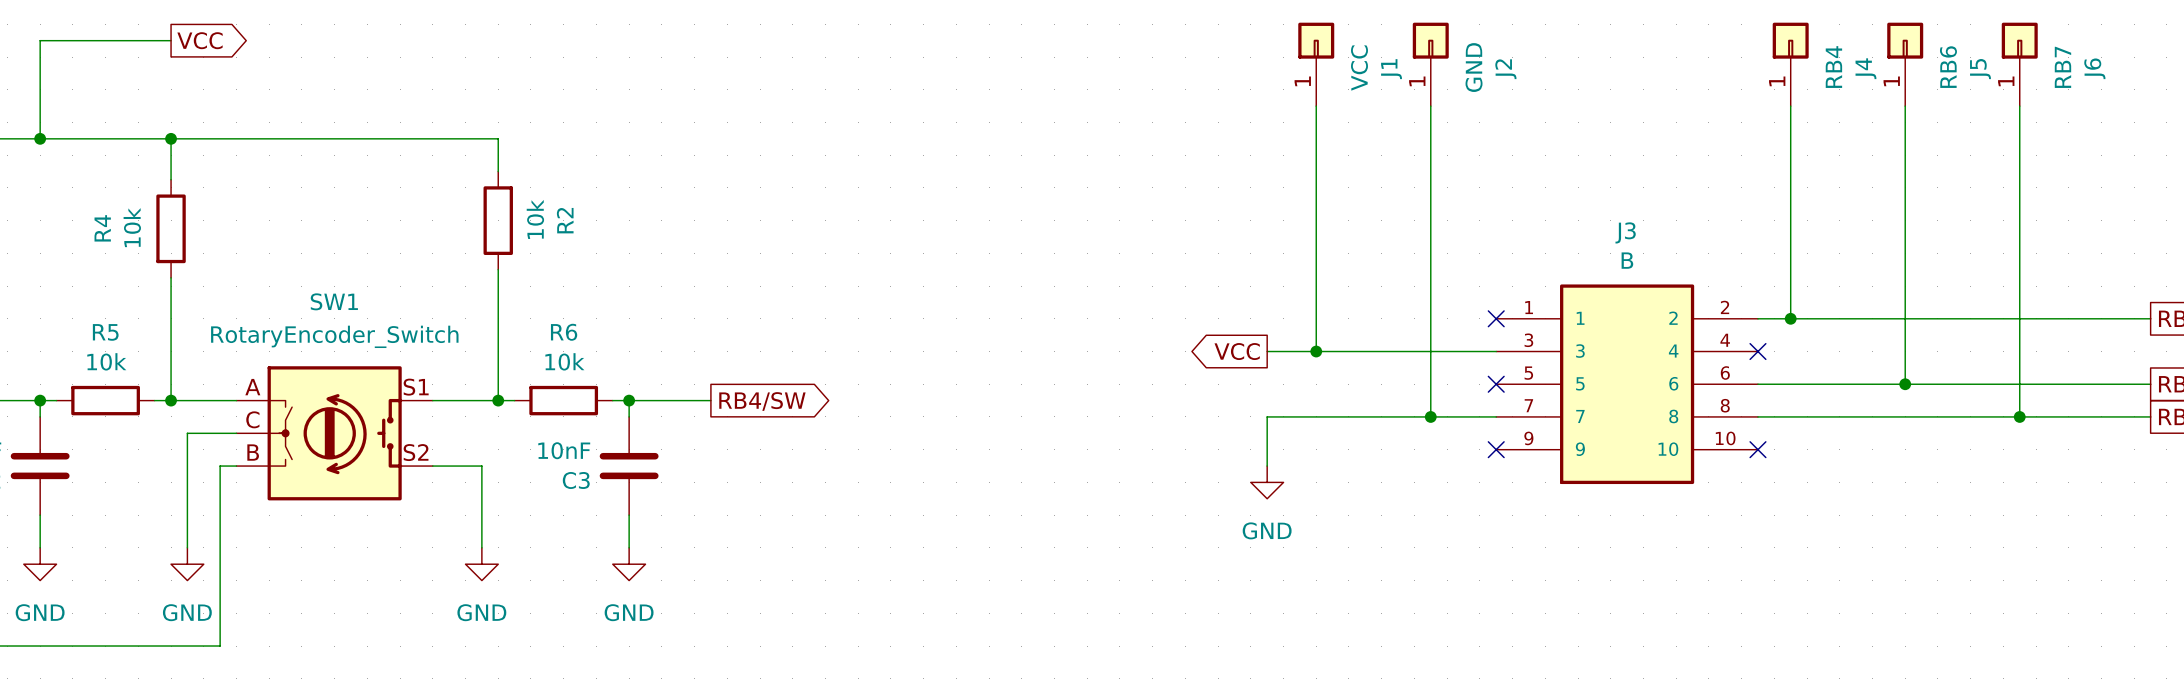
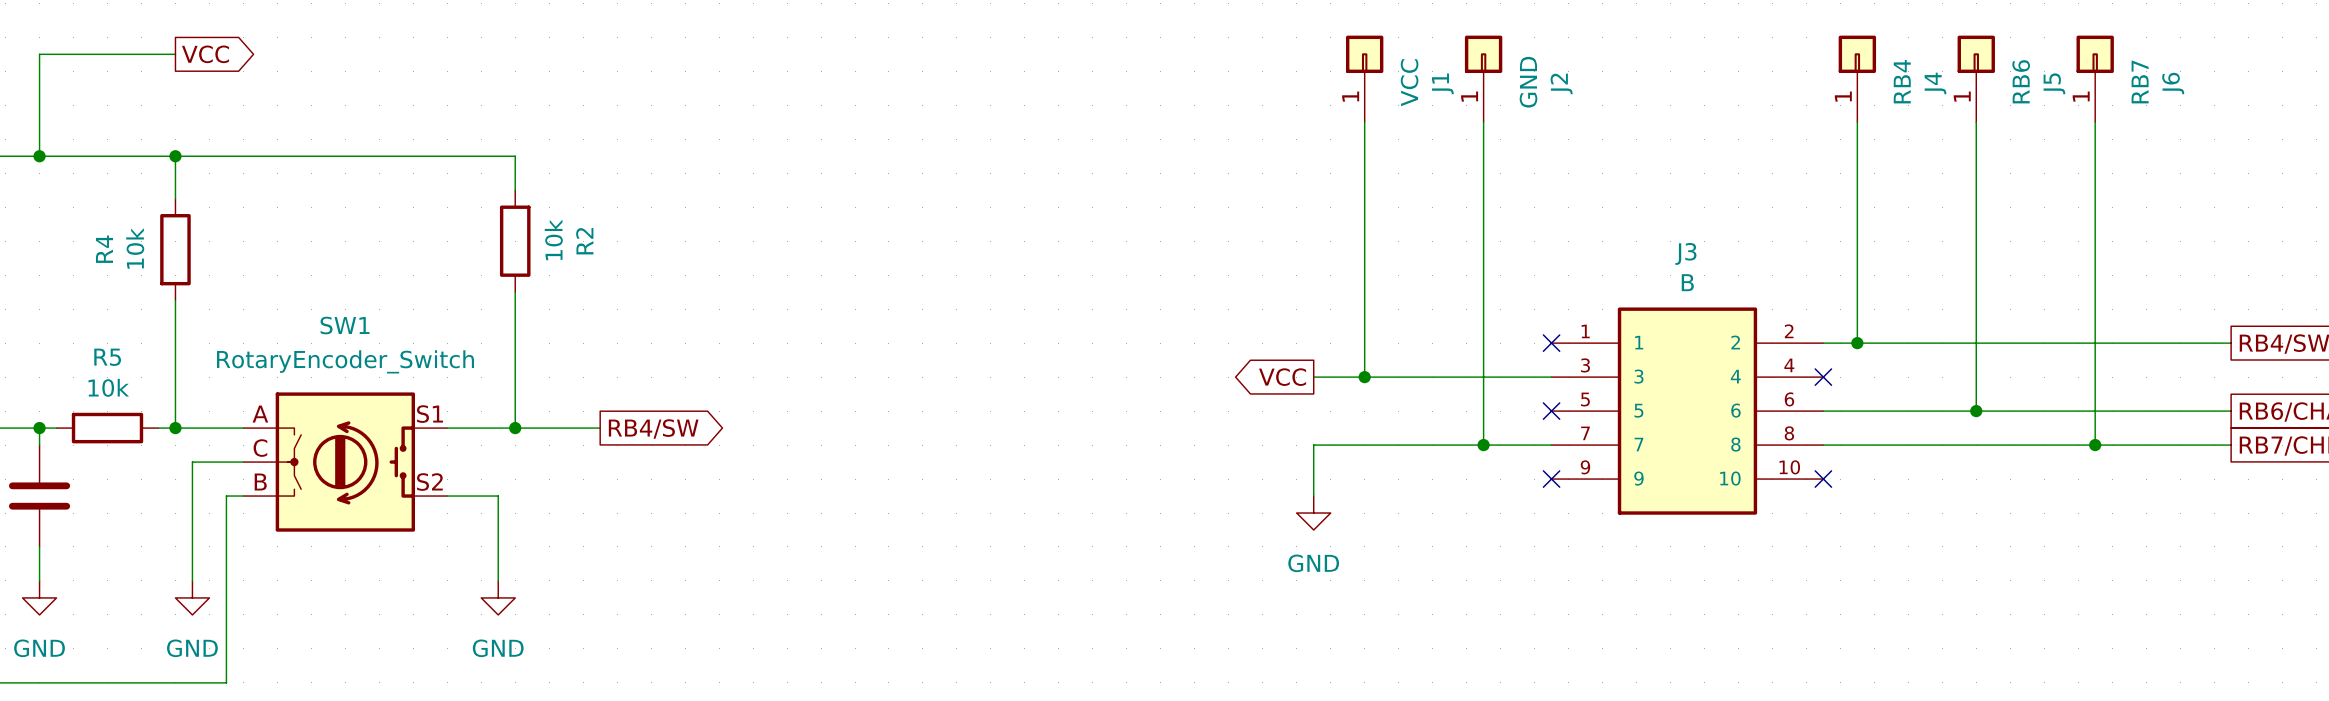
wire: none -> (532, 428) (600, 428)
R6: 10k (563, 400) -> none
wire: (612, 400) (710, 400) -> none
wire: (629, 400) (629, 416) -> none
junction: (629, 400) -> none
global label position: RB4/SW (762, 401) -> RB4/SW (653, 429)
C3: 10nF (629, 466) -> none
wire: (629, 515) (629, 547) -> none
power symbol: GND (629, 564) -> none

